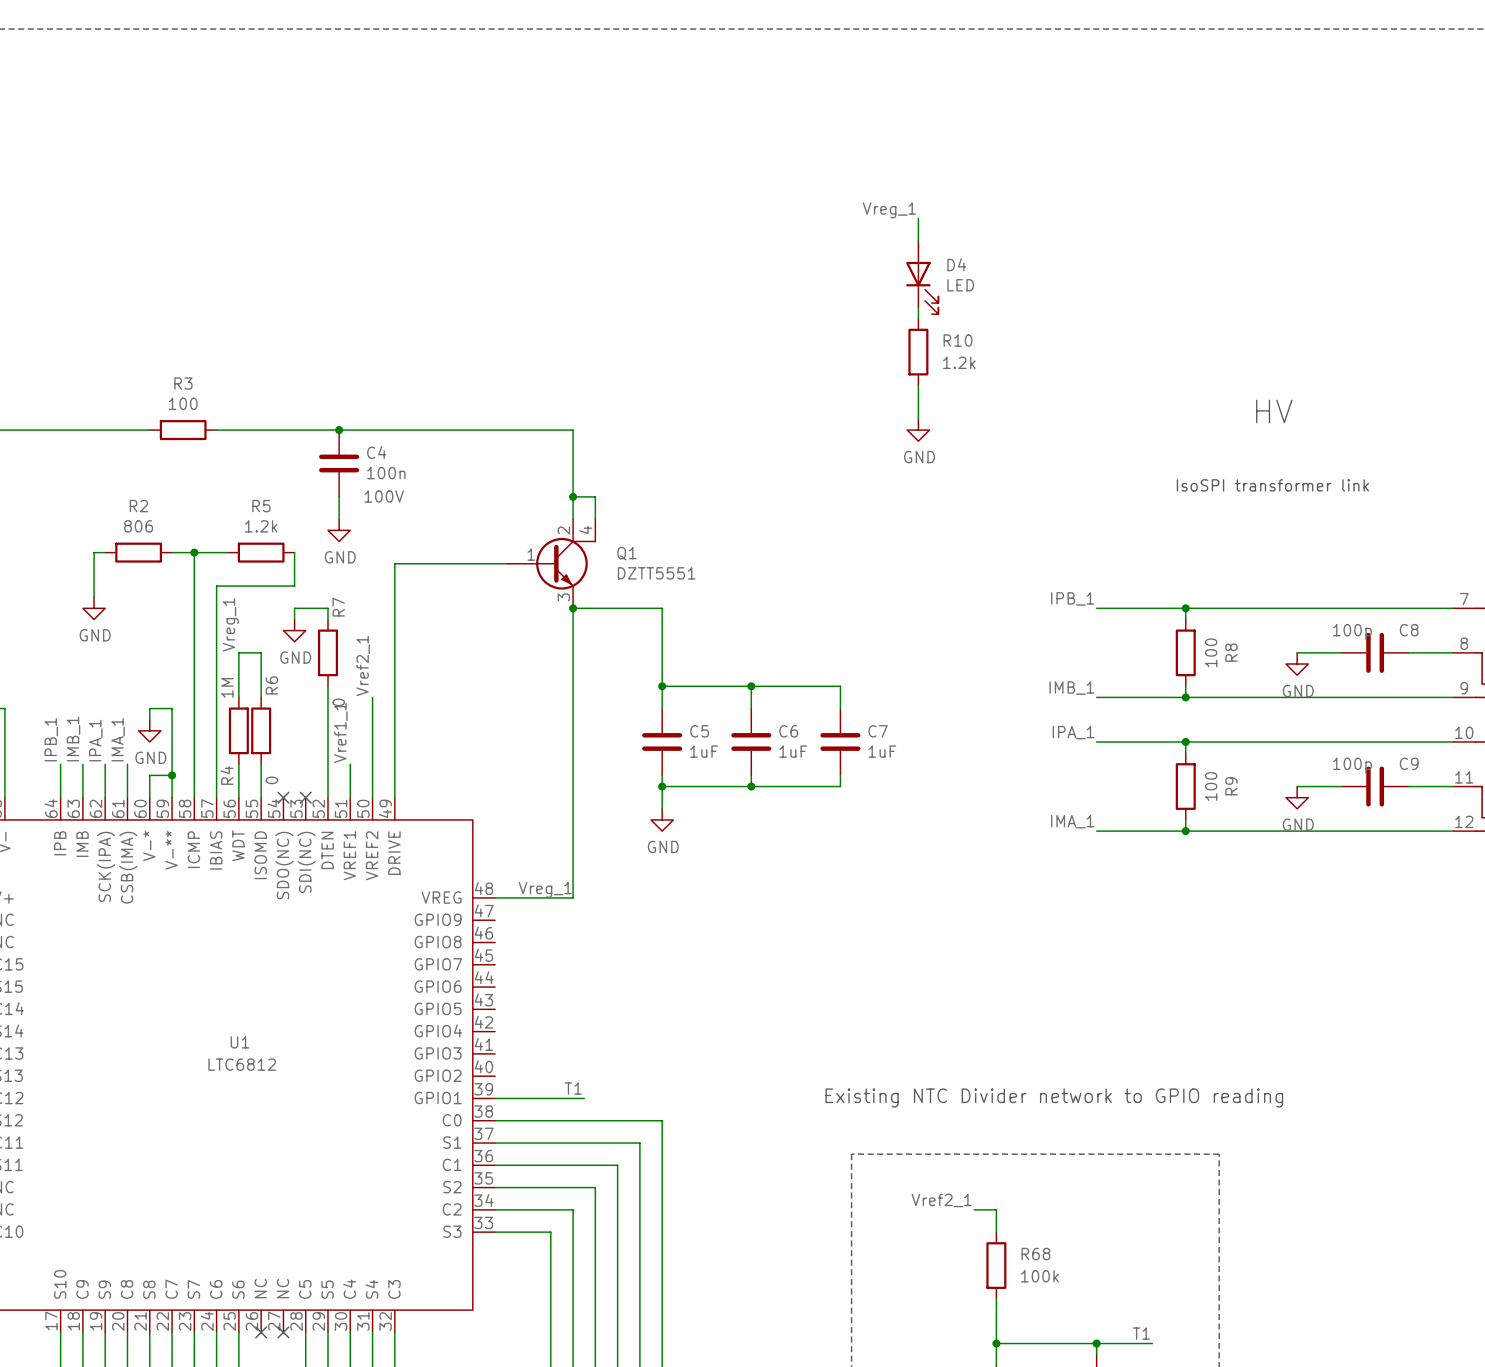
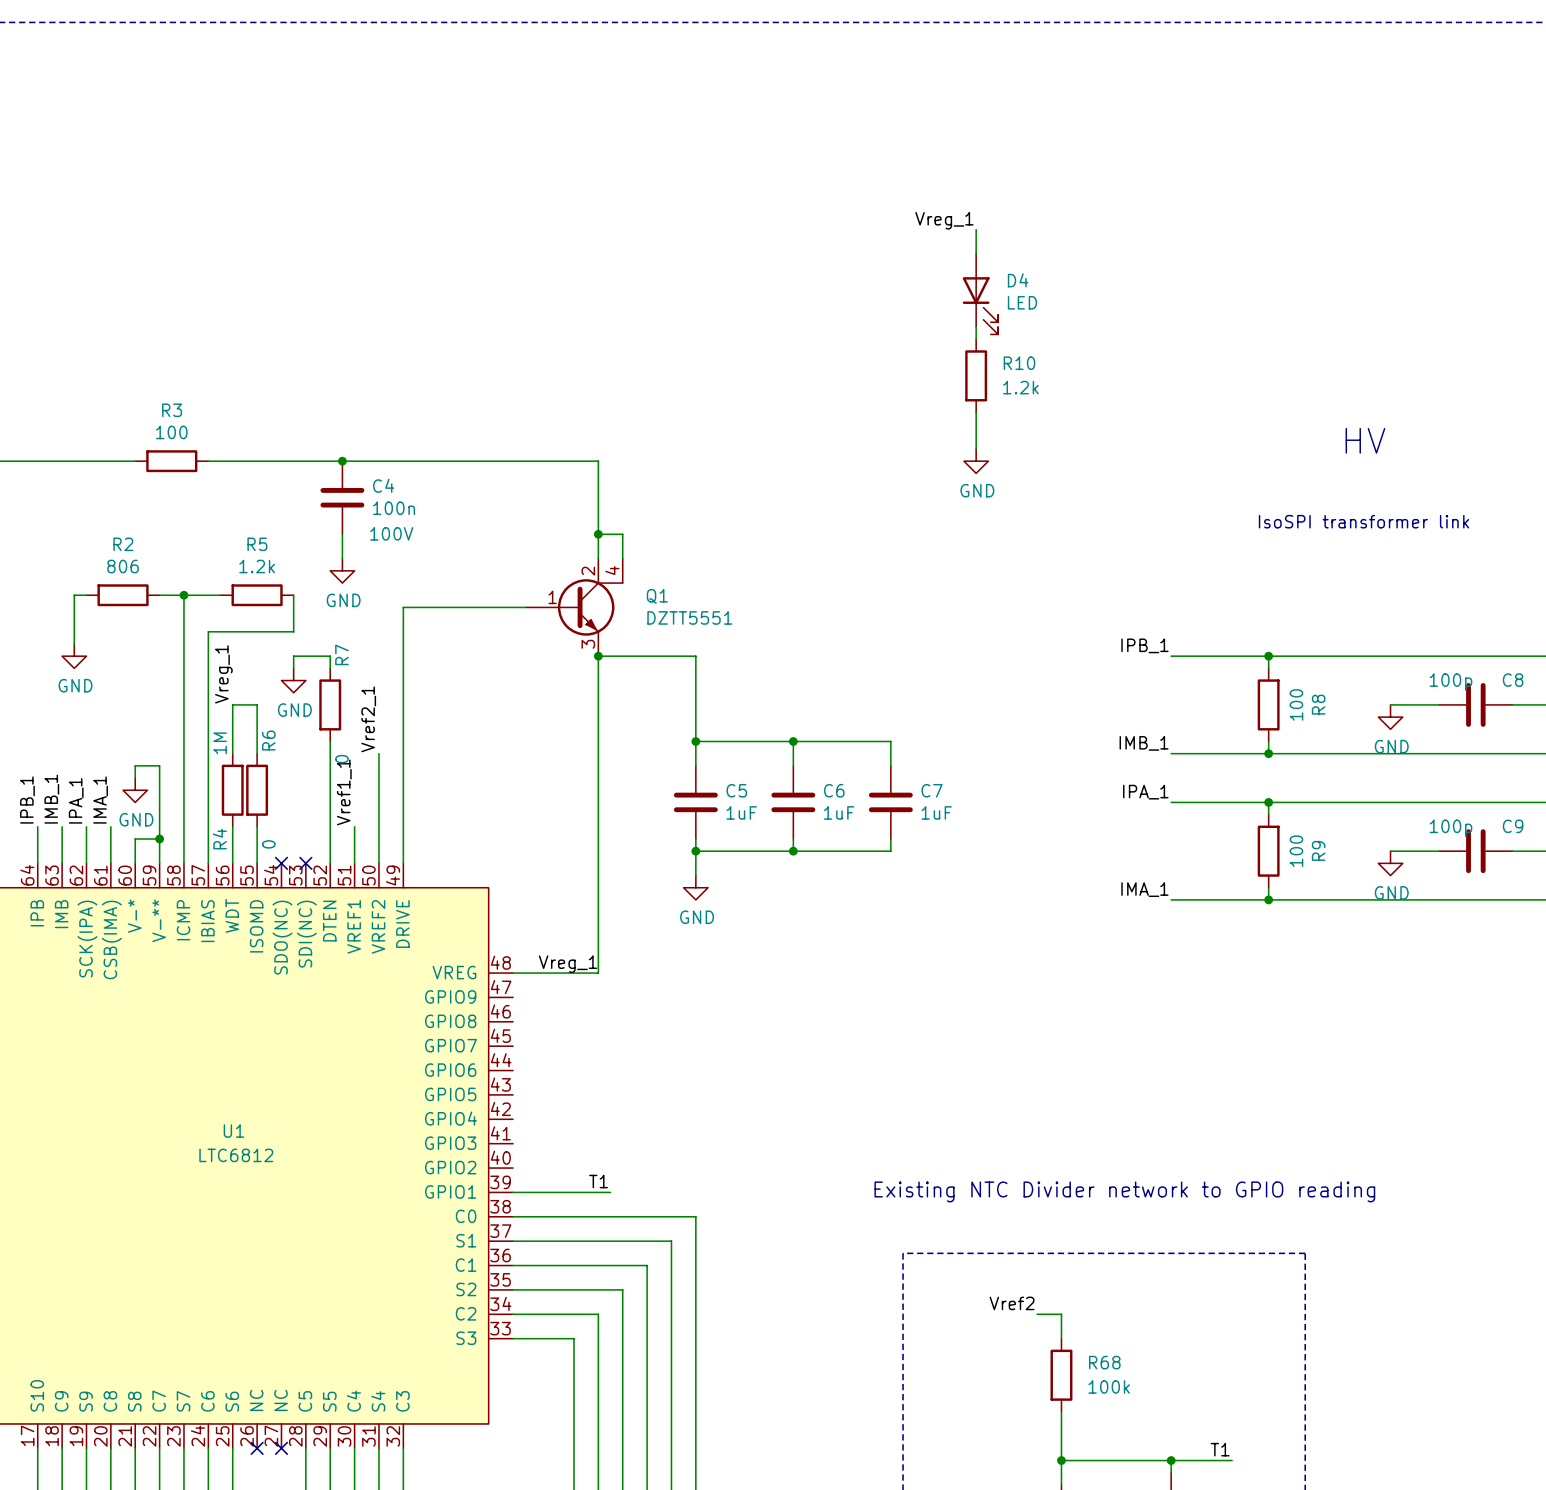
label: Vref2_1 (941, 1200) -> Vref2 (1012, 1303)

